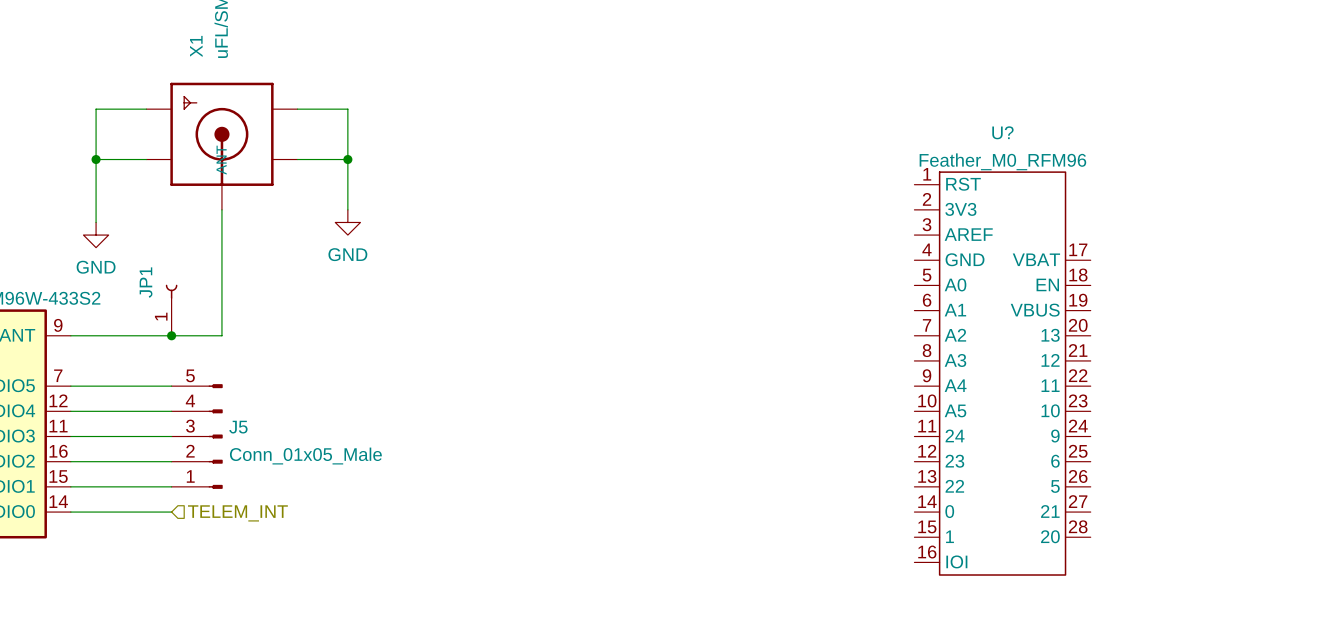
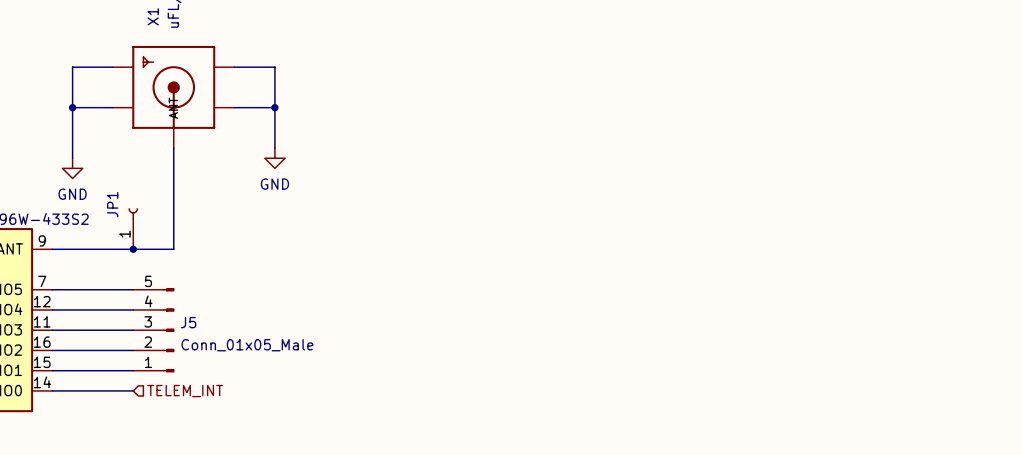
U?: Feather_M0_RFM96 (1002, 373) -> none

